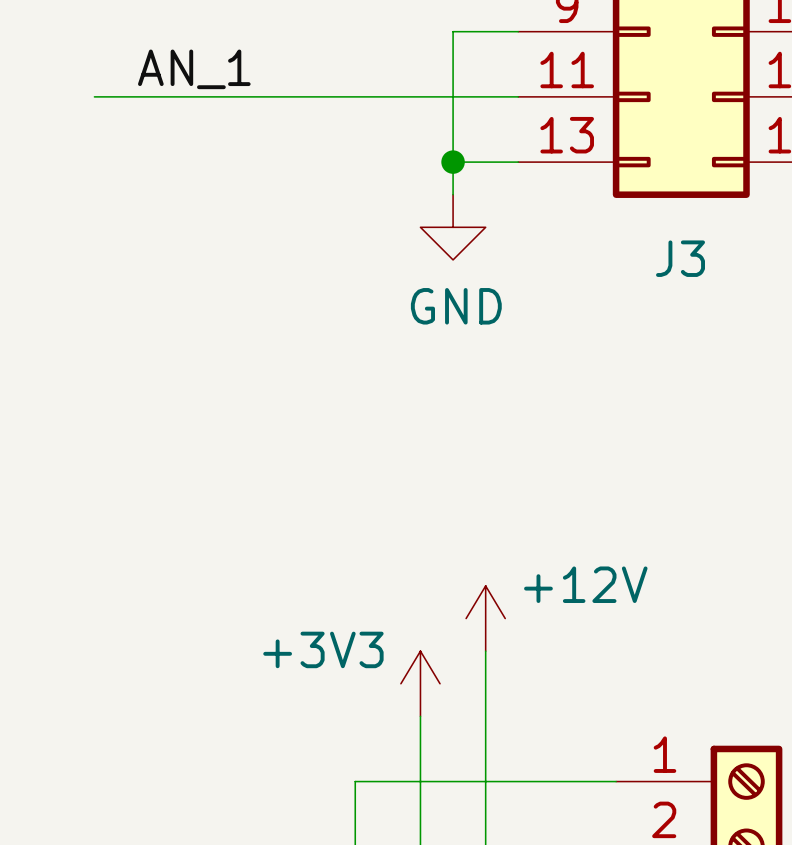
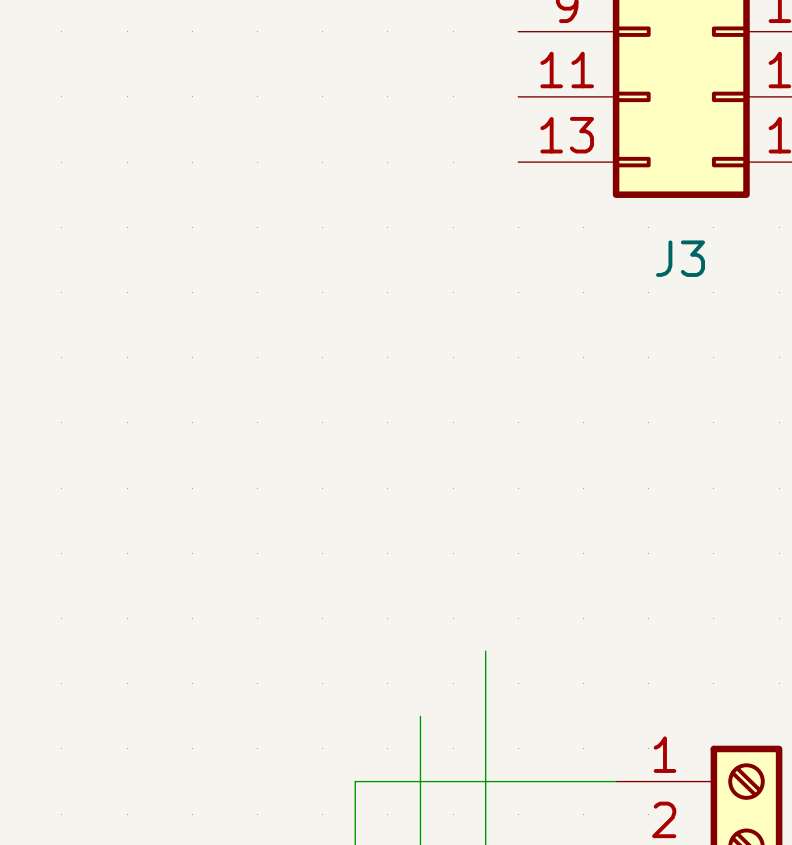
wire: (518, 31) (453, 31) (453, 194) -> none
label: AN_1 (194, 69) -> none
wire: (94, 96) (518, 96) -> none
wire: (453, 162) (518, 162) -> none
junction: (453, 162) -> none
power symbol: GND (453, 227) -> none
power symbol: +12V (485, 618) -> none
power symbol: +3V3 (420, 683) -> none

